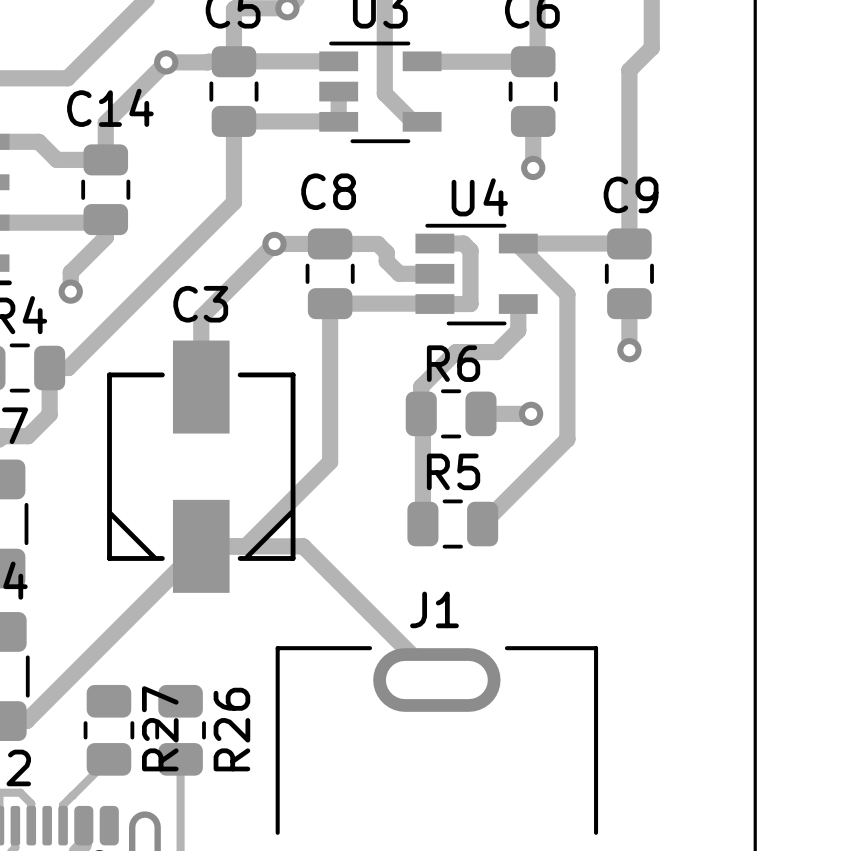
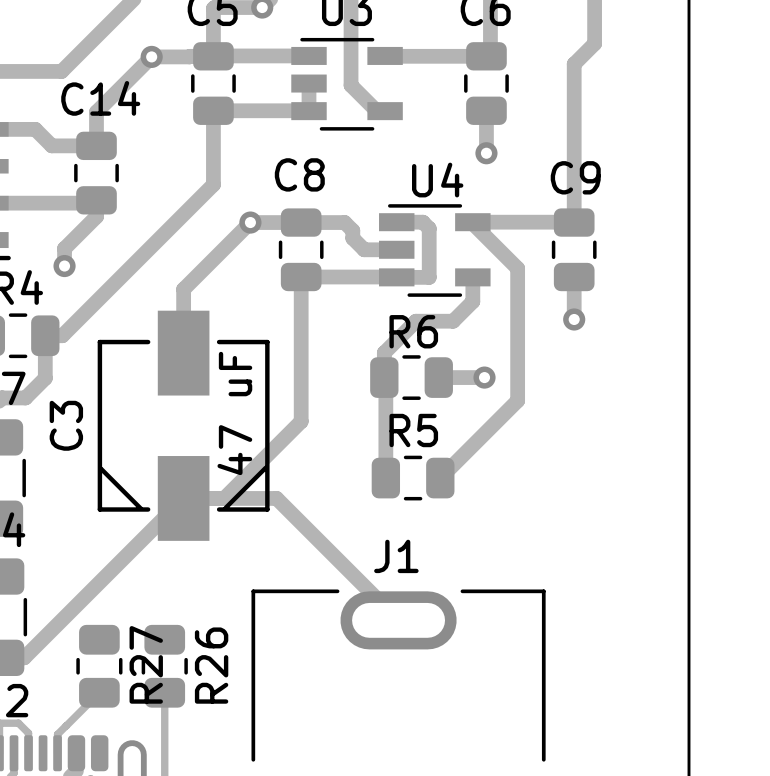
C3 name rotation: 0° (200, 304) -> 90° counterclockwise (66, 425)
C3 name position: C3 (200, 304) -> C3 (66, 425)
C3 value: none -> 47 uF (234, 413)

